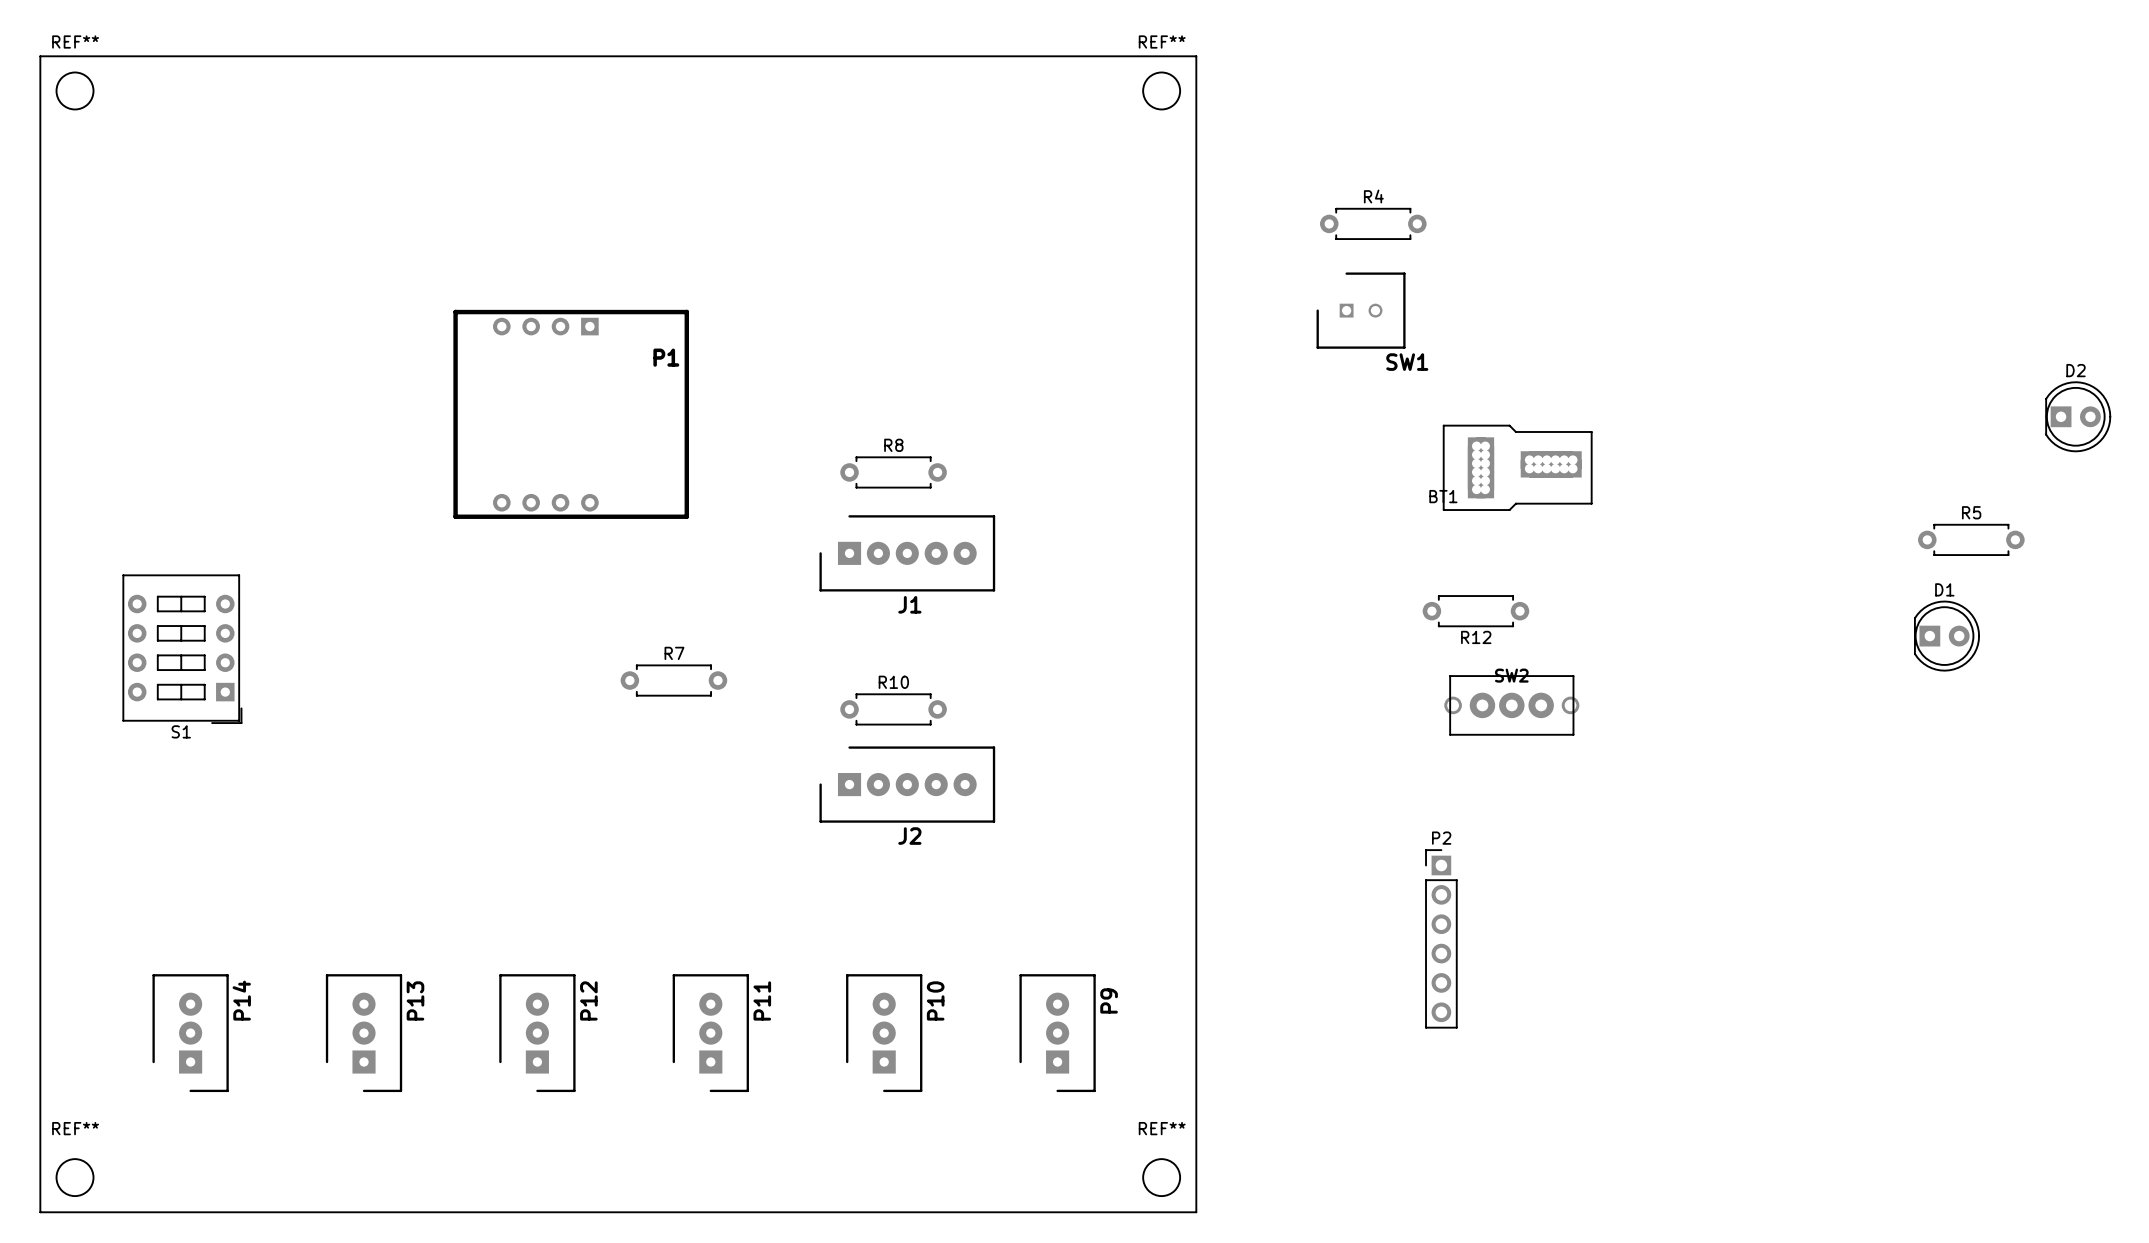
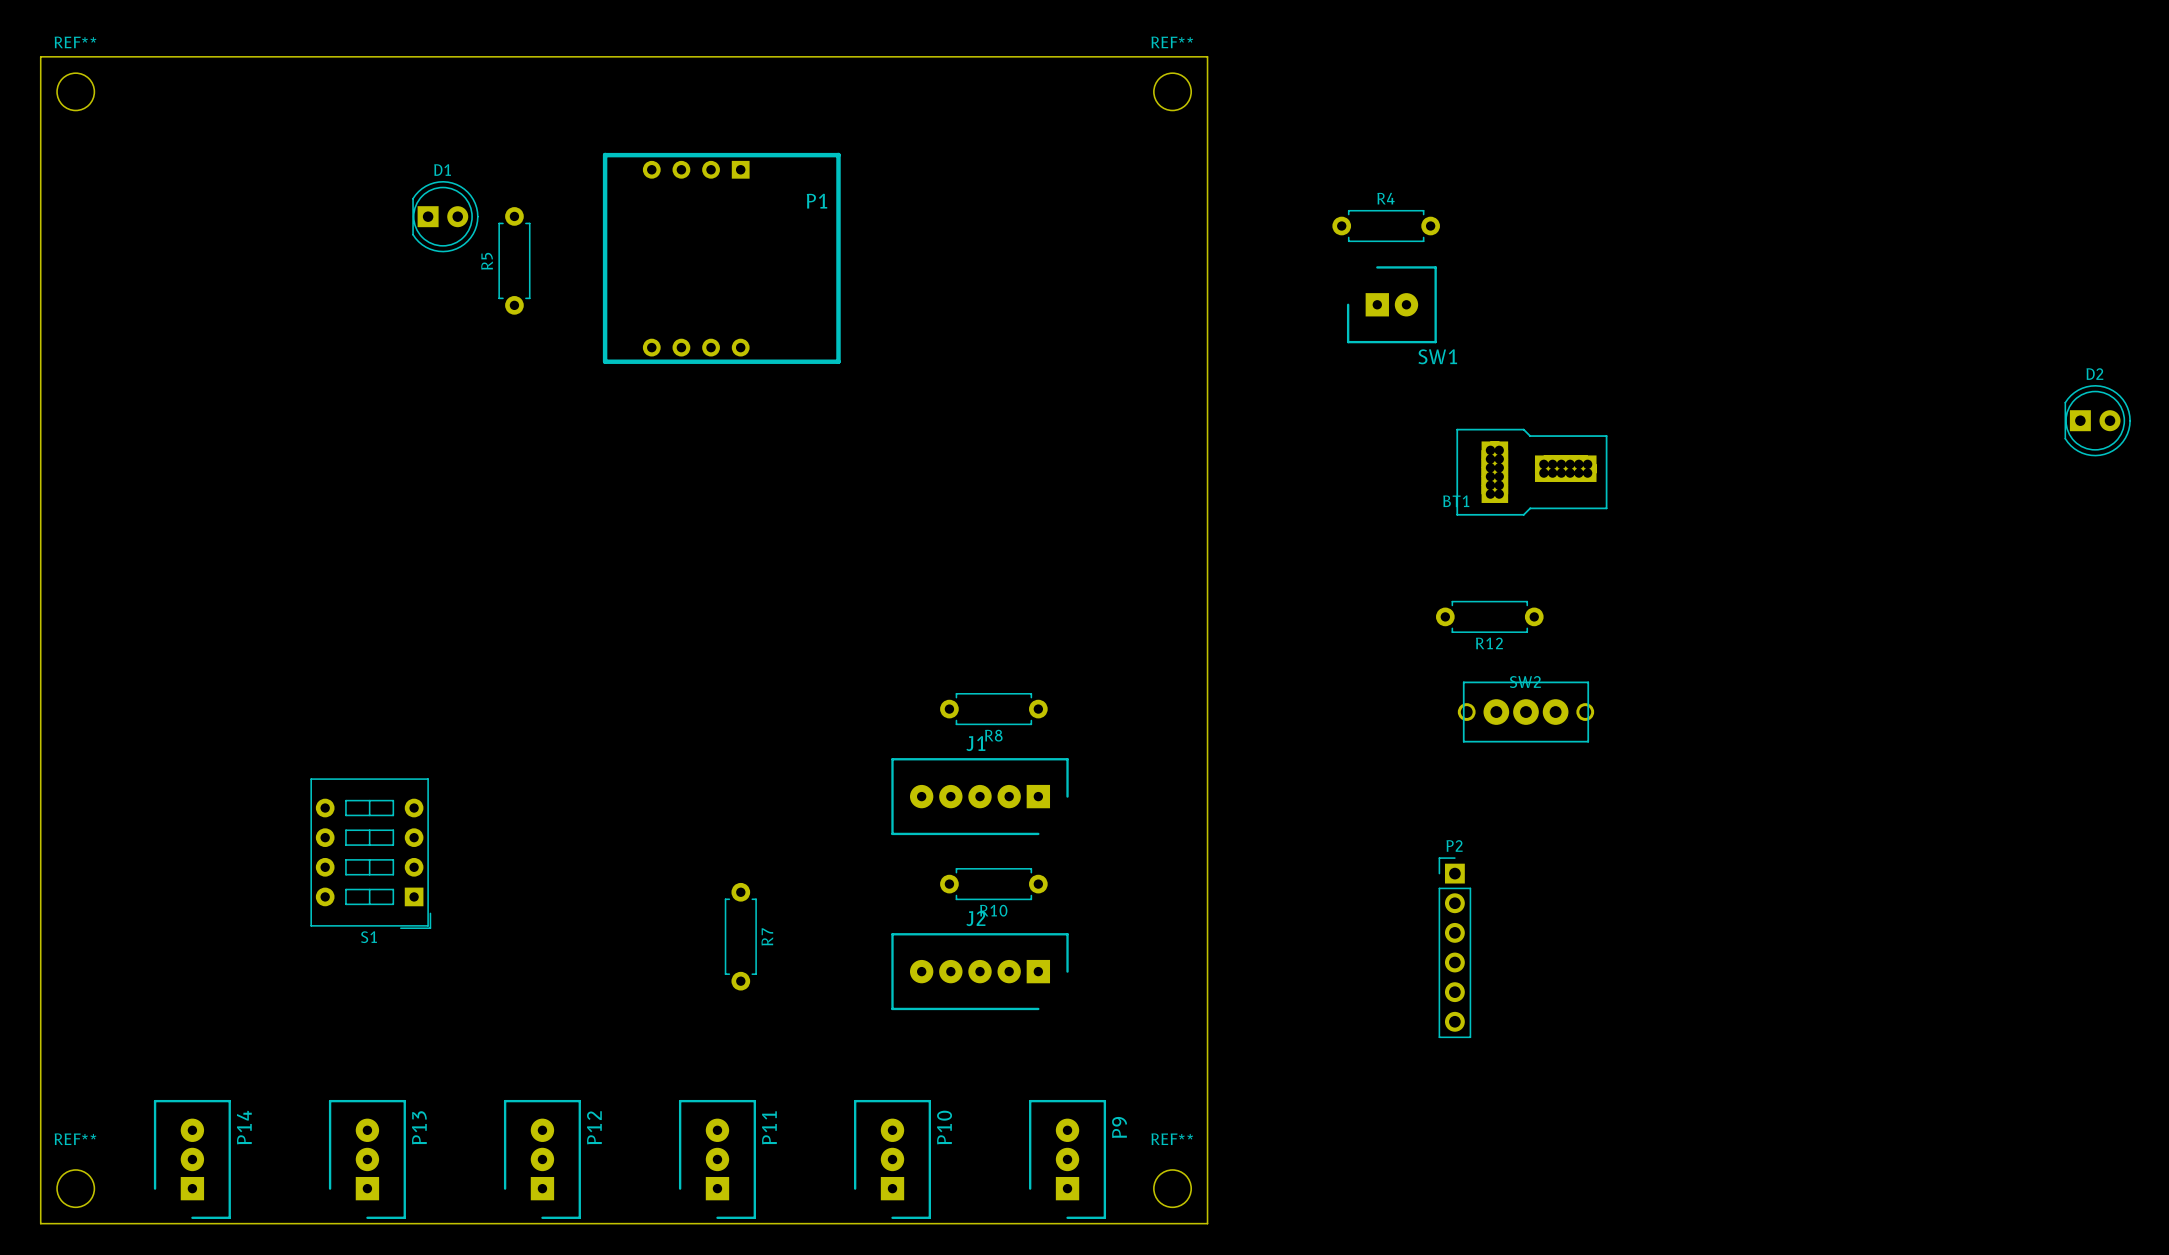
SW1 footprint: [1316, 272, 1406, 349] -> [1346, 266, 1437, 344]
P1 position: (571, 414) -> (721, 258)
R8 name position: R8 (893, 445) -> R8 (993, 735)
R8 position: (893, 472) -> (993, 709)
R5 name position: R5 (1971, 512) -> R5 (487, 261)
R5 rotation: 0° (1971, 539) -> 90° clockwise (514, 260)
R5 position: (1971, 539) -> (514, 260)
J1 rotation: 0° (907, 553) -> 180° (980, 796)
J1 position: (907, 553) -> (980, 796)
D1 footprint: [1914, 600, 1980, 672] -> [412, 181, 479, 253]
S1 position: (182, 649) -> (370, 853)
R7 rotation: 0° (673, 680) -> 90° clockwise (740, 936)
R7 position: (673, 680) -> (740, 936)
R10 name position: R10 (893, 682) -> R10 (993, 910)
R10 position: (893, 709) -> (993, 884)
J2 rotation: 0° (907, 784) -> 180° (980, 971)
J2 position: (907, 784) -> (980, 971)
P14 position: (190, 1033) -> (192, 1159)
P13 position: (364, 1033) -> (367, 1159)
P12 position: (537, 1033) -> (542, 1159)
P11 position: (710, 1033) -> (717, 1159)
P10 position: (884, 1033) -> (892, 1159)
P9 position: (1057, 1033) -> (1067, 1159)

